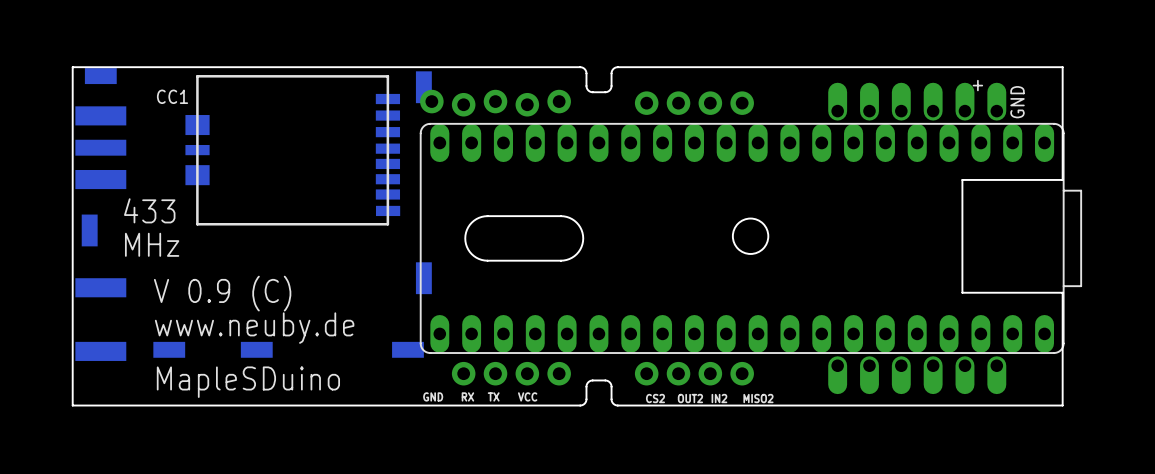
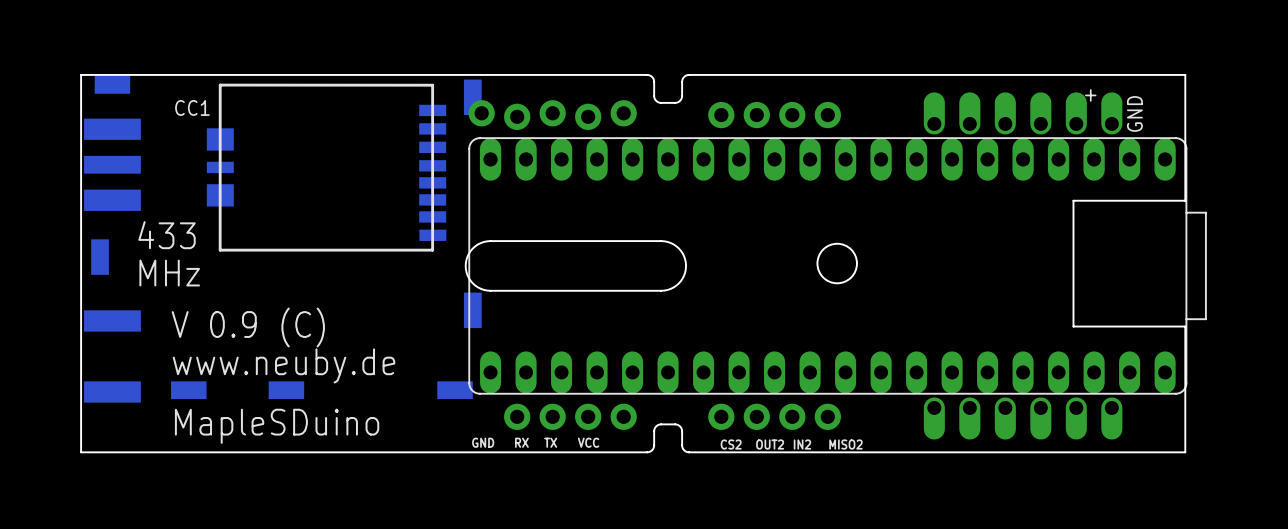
board edge: (487, 216) (479, 217) (471, 222) (466, 229) (465, 238) (466, 246) (471, 254) (479, 259) (487, 260) -> (543, 241) (484, 241) (470, 250) (465, 265) (470, 281) (484, 289) (543, 290)
board edge: (560, 216) (569, 217) (576, 222) (581, 229) (583, 238) (581, 246) (576, 254) (569, 259) (560, 260) -> (625, 241) (670, 242) (680, 250) (686, 265) (680, 281) (670, 288) (625, 290)

